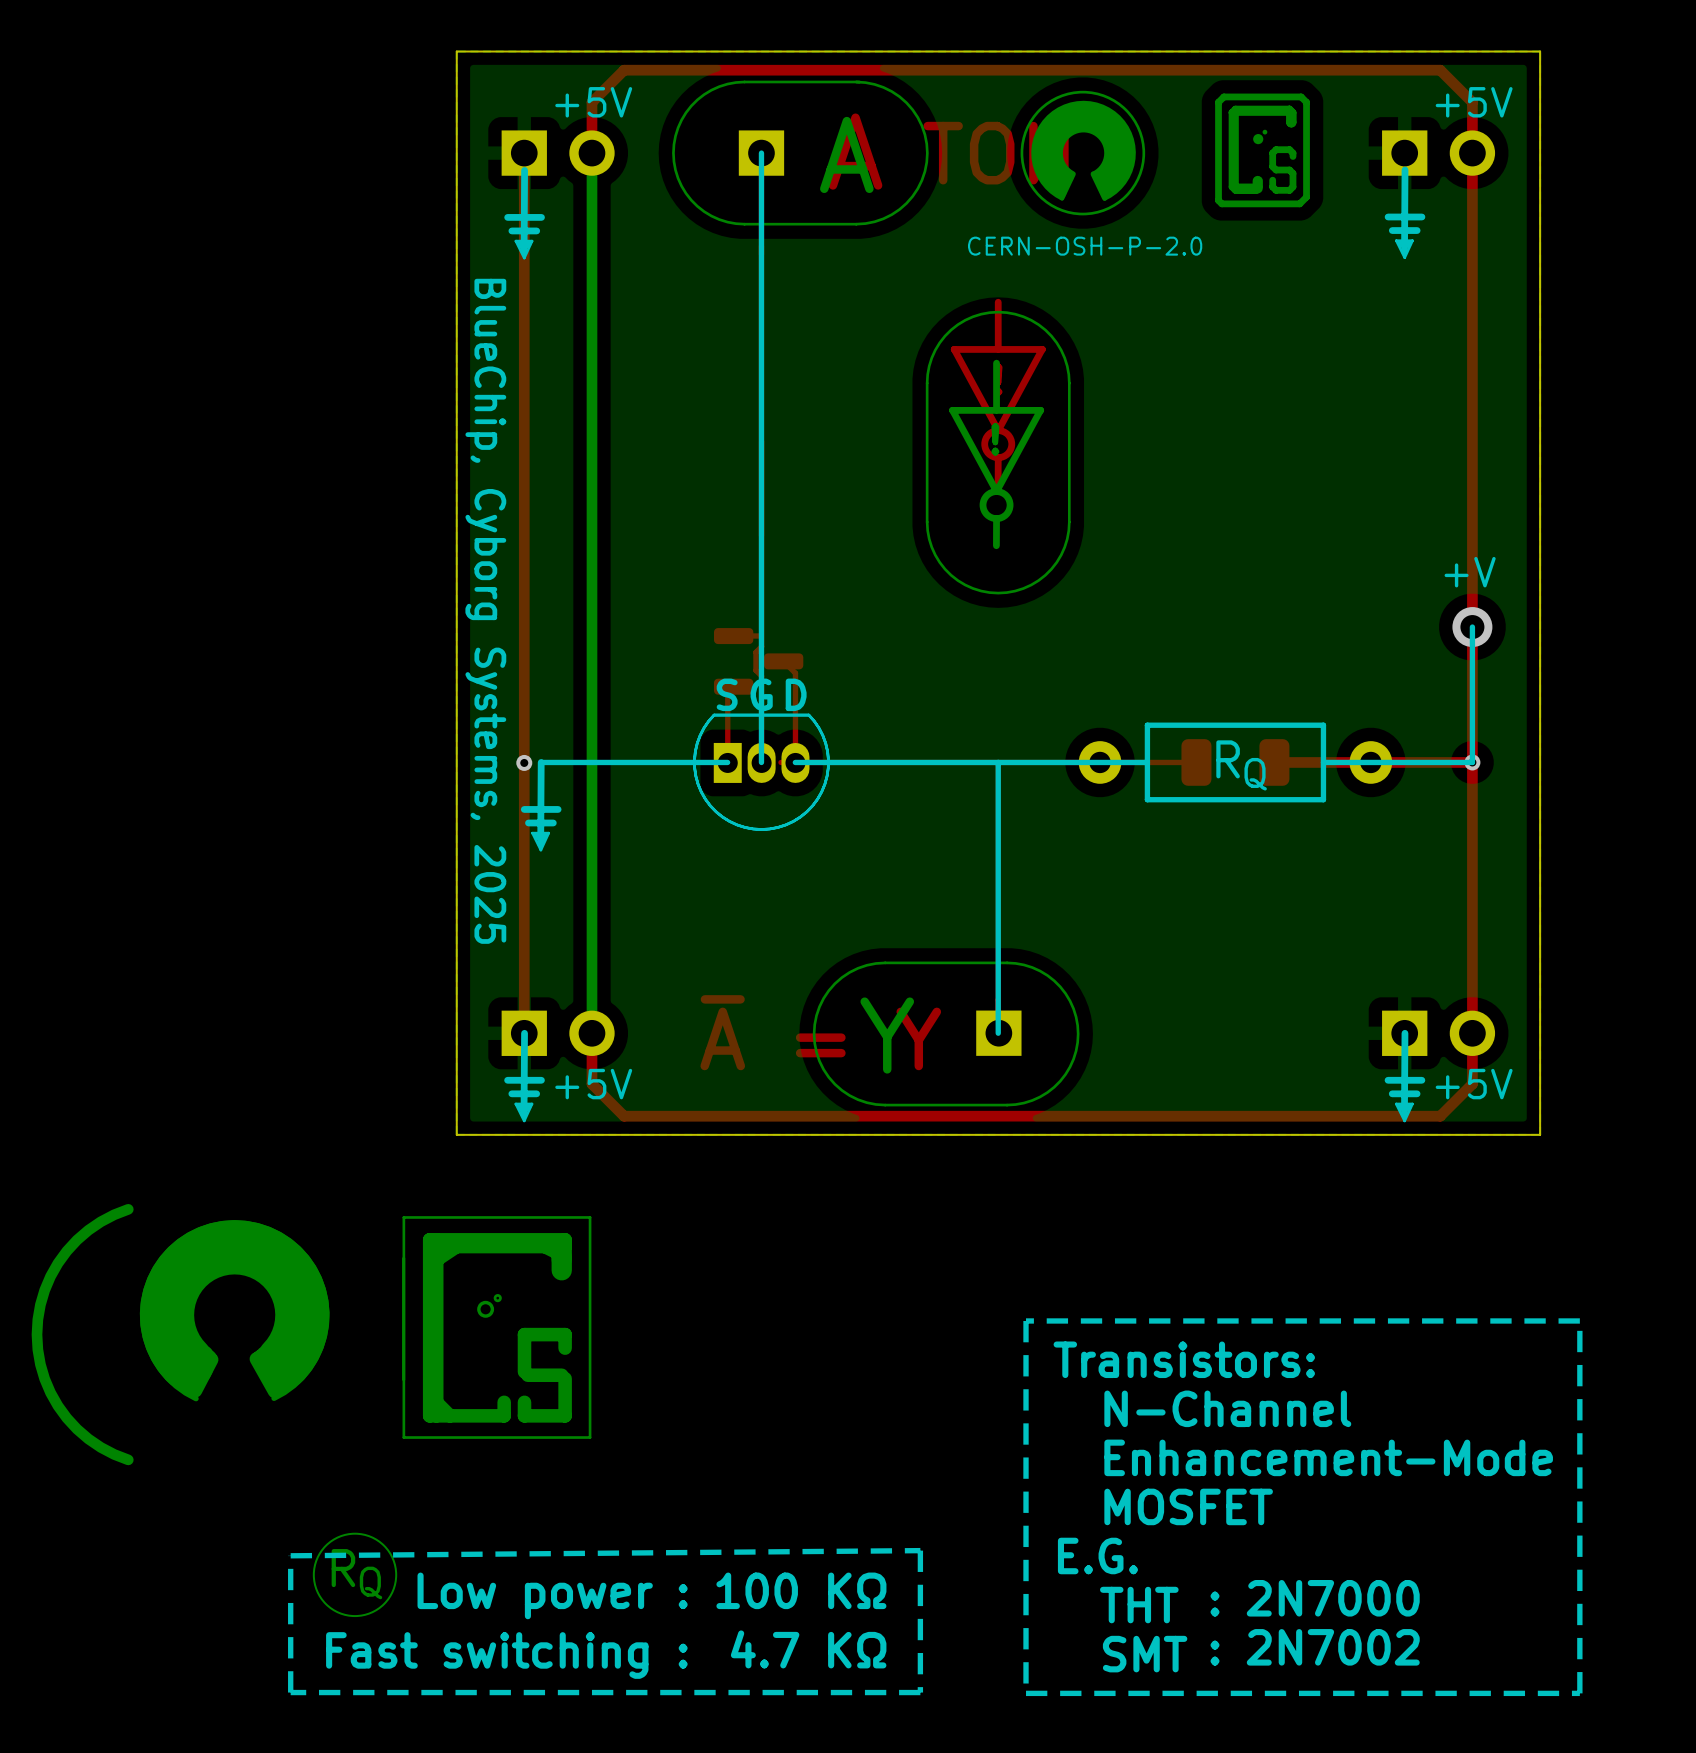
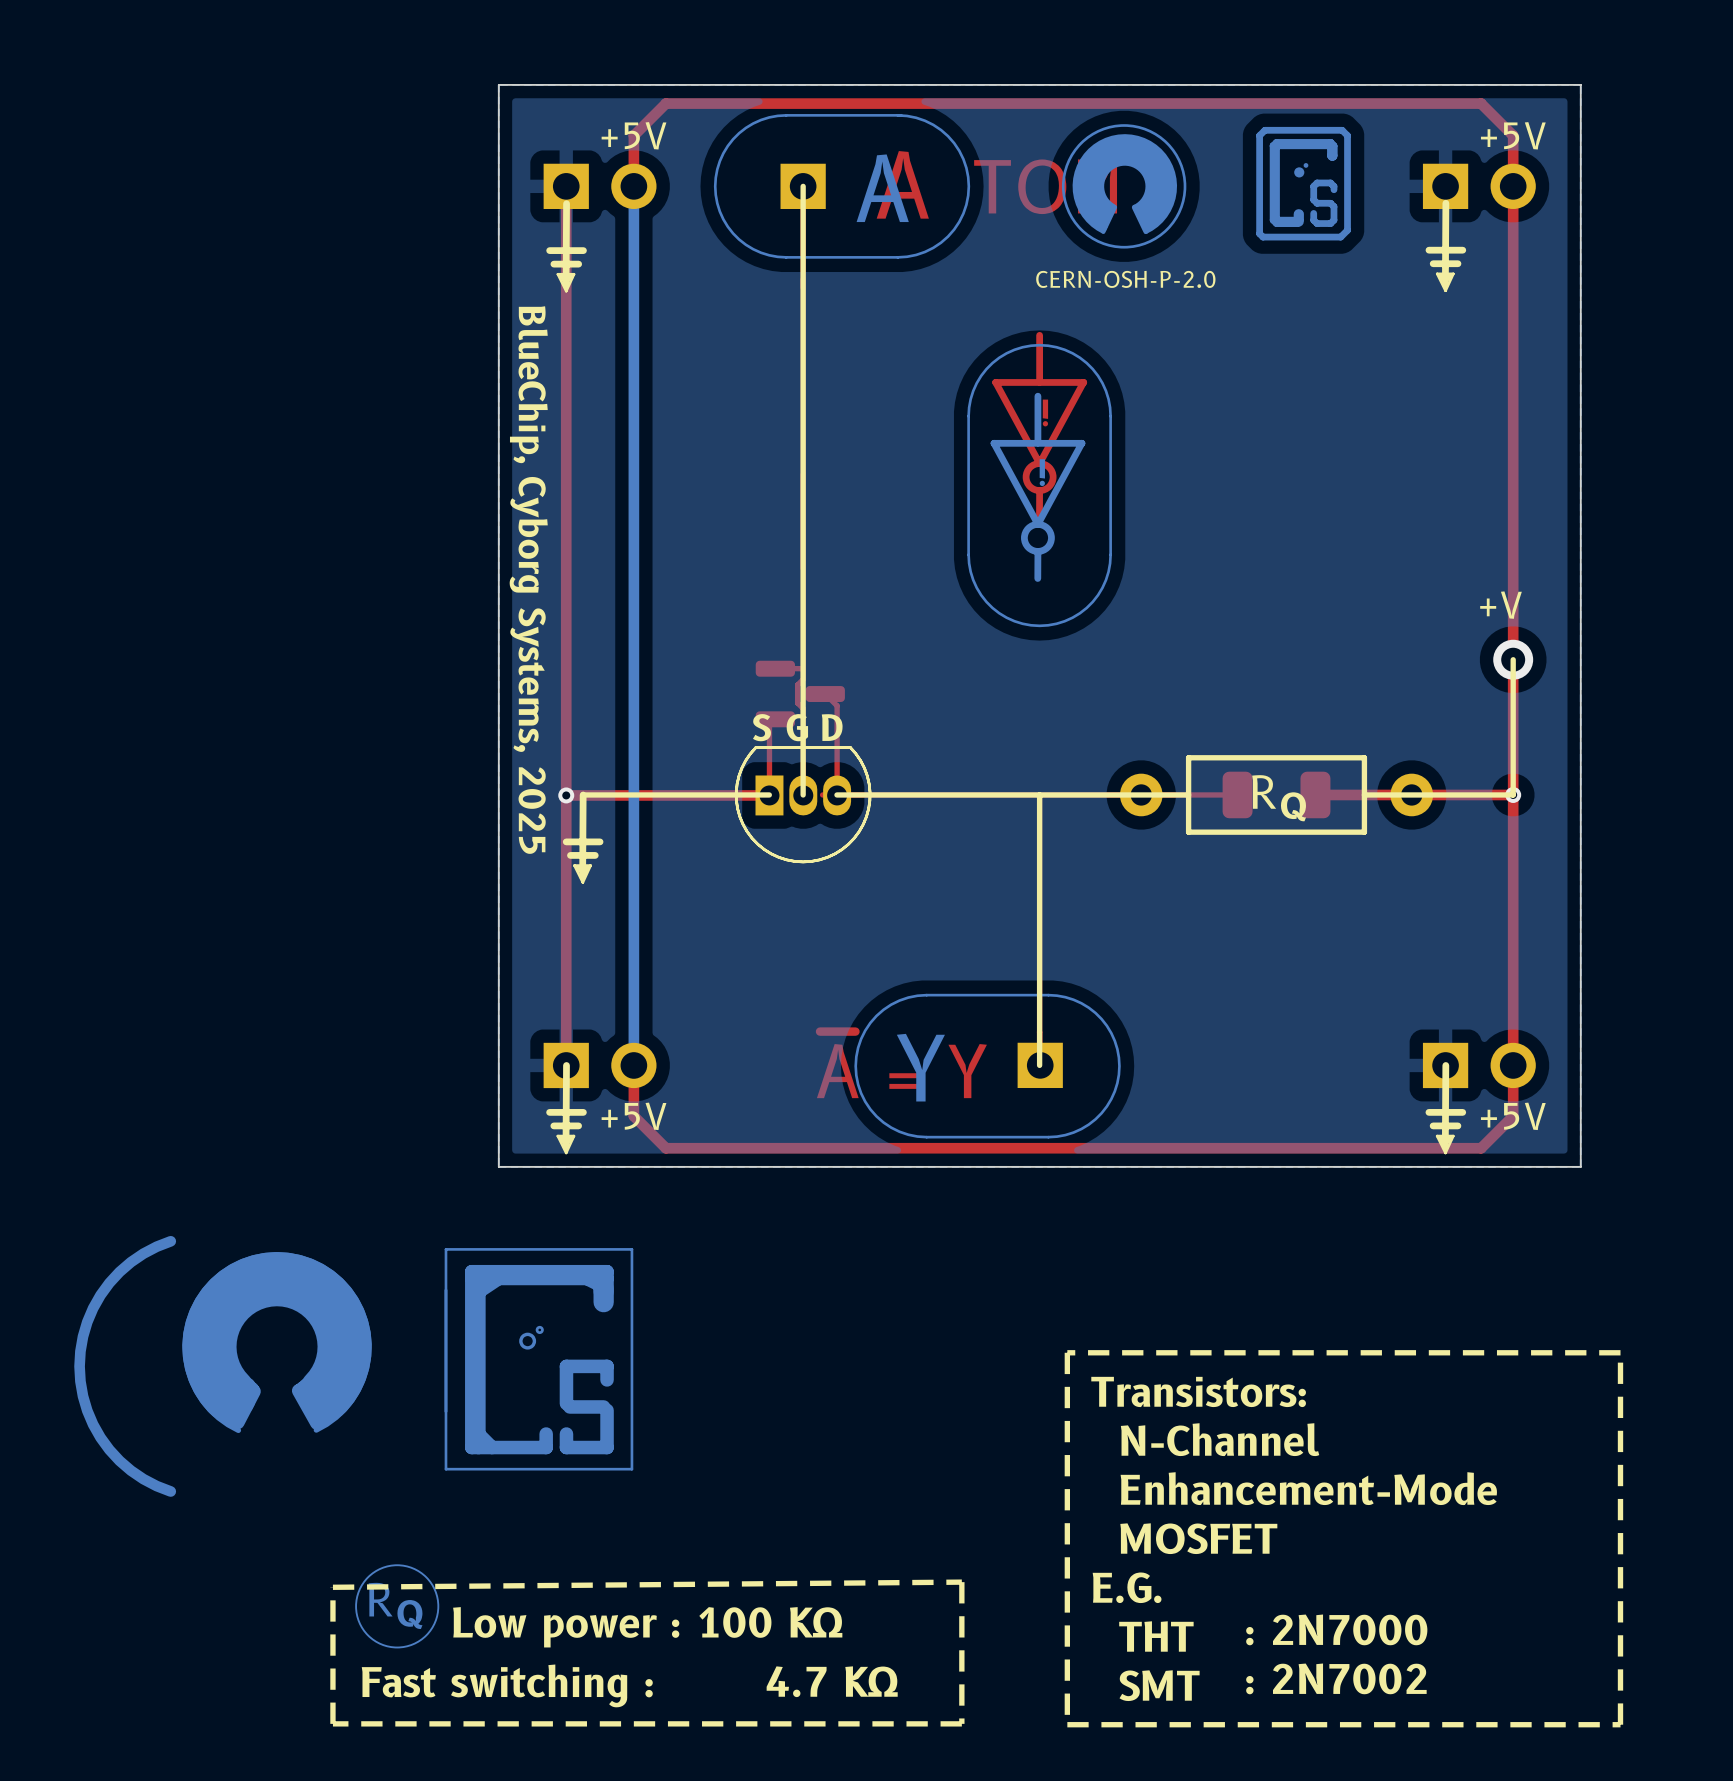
top track: none -> (769, 795) (566, 795)

